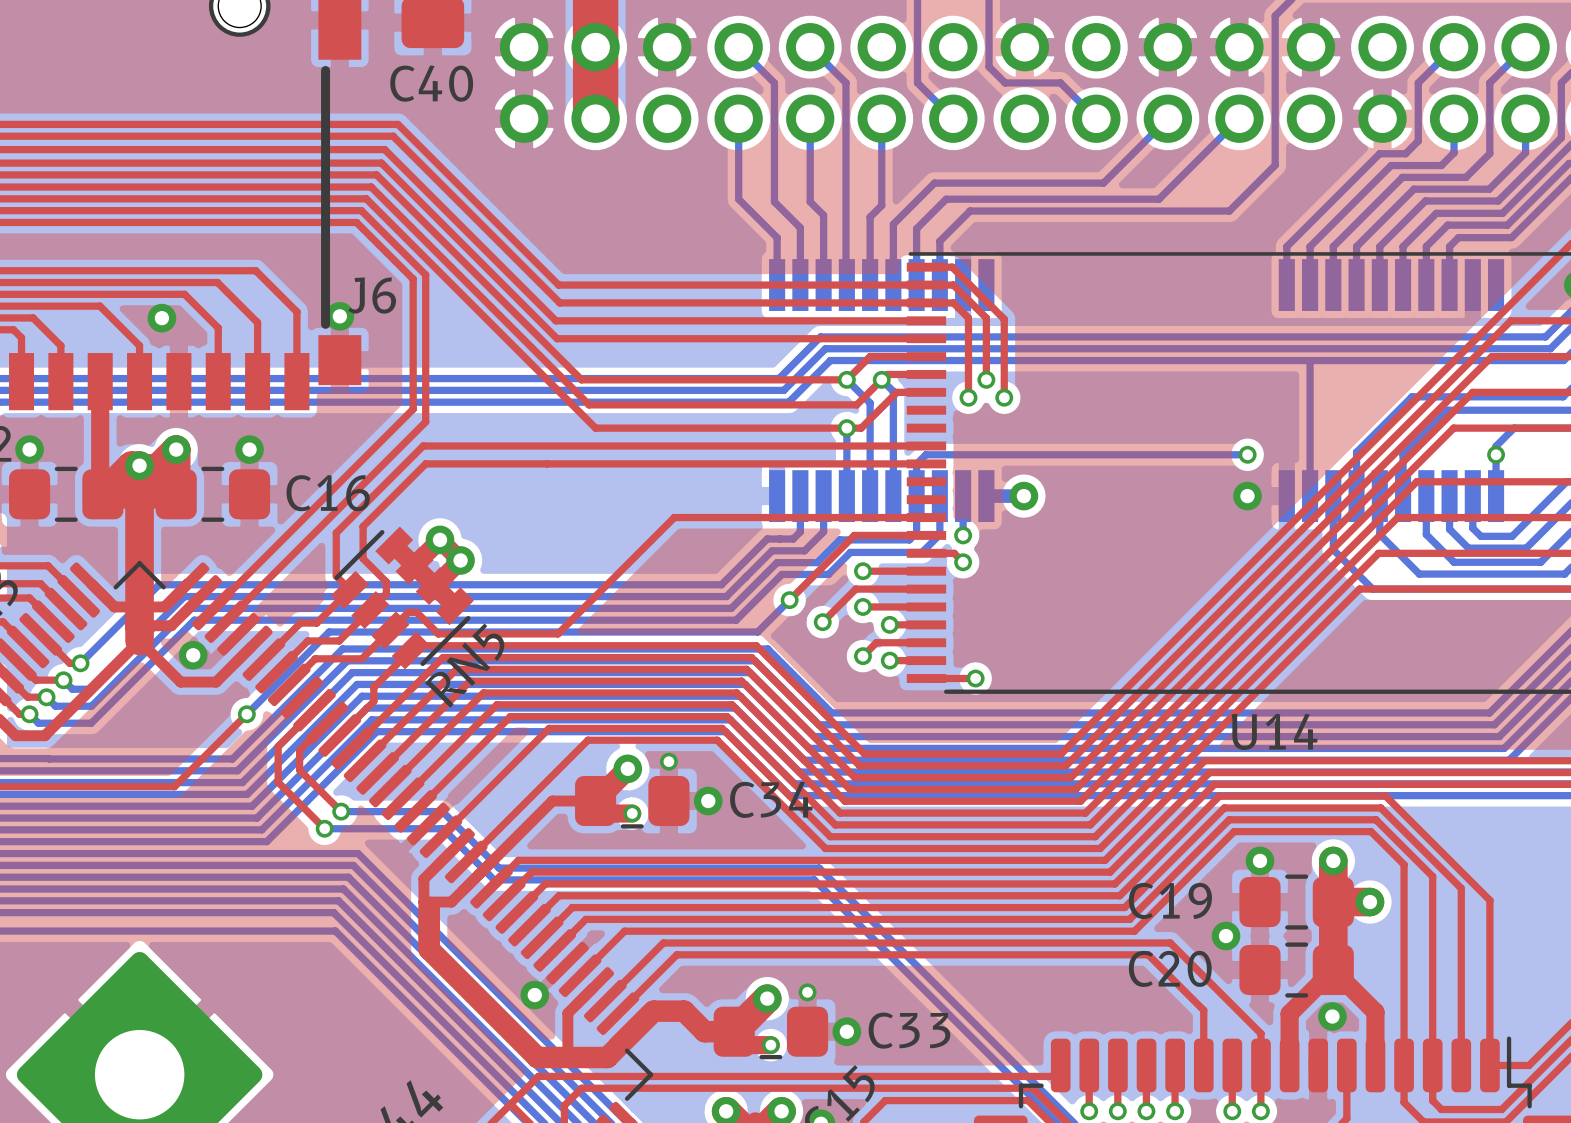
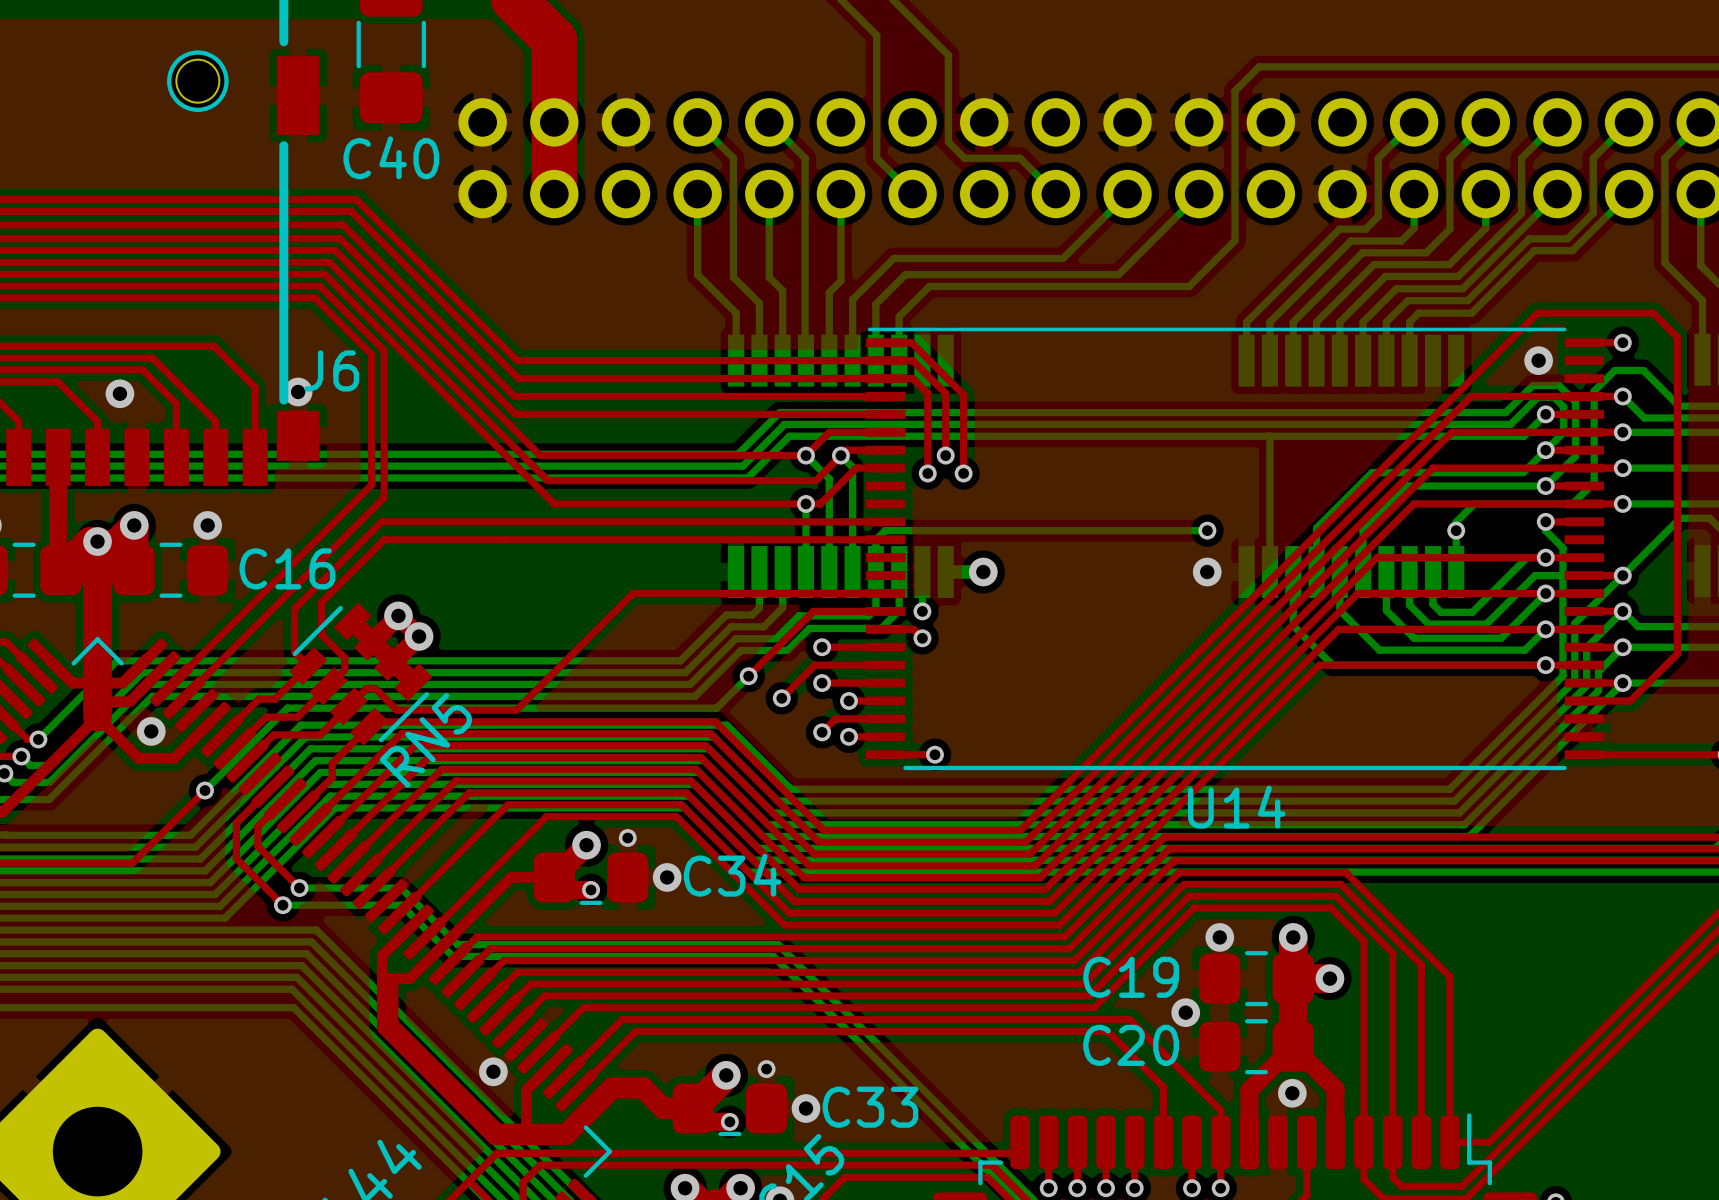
top track: (194, 282) (217, 282) (257, 322) (257, 345) -> (152, 358) (215, 421)

